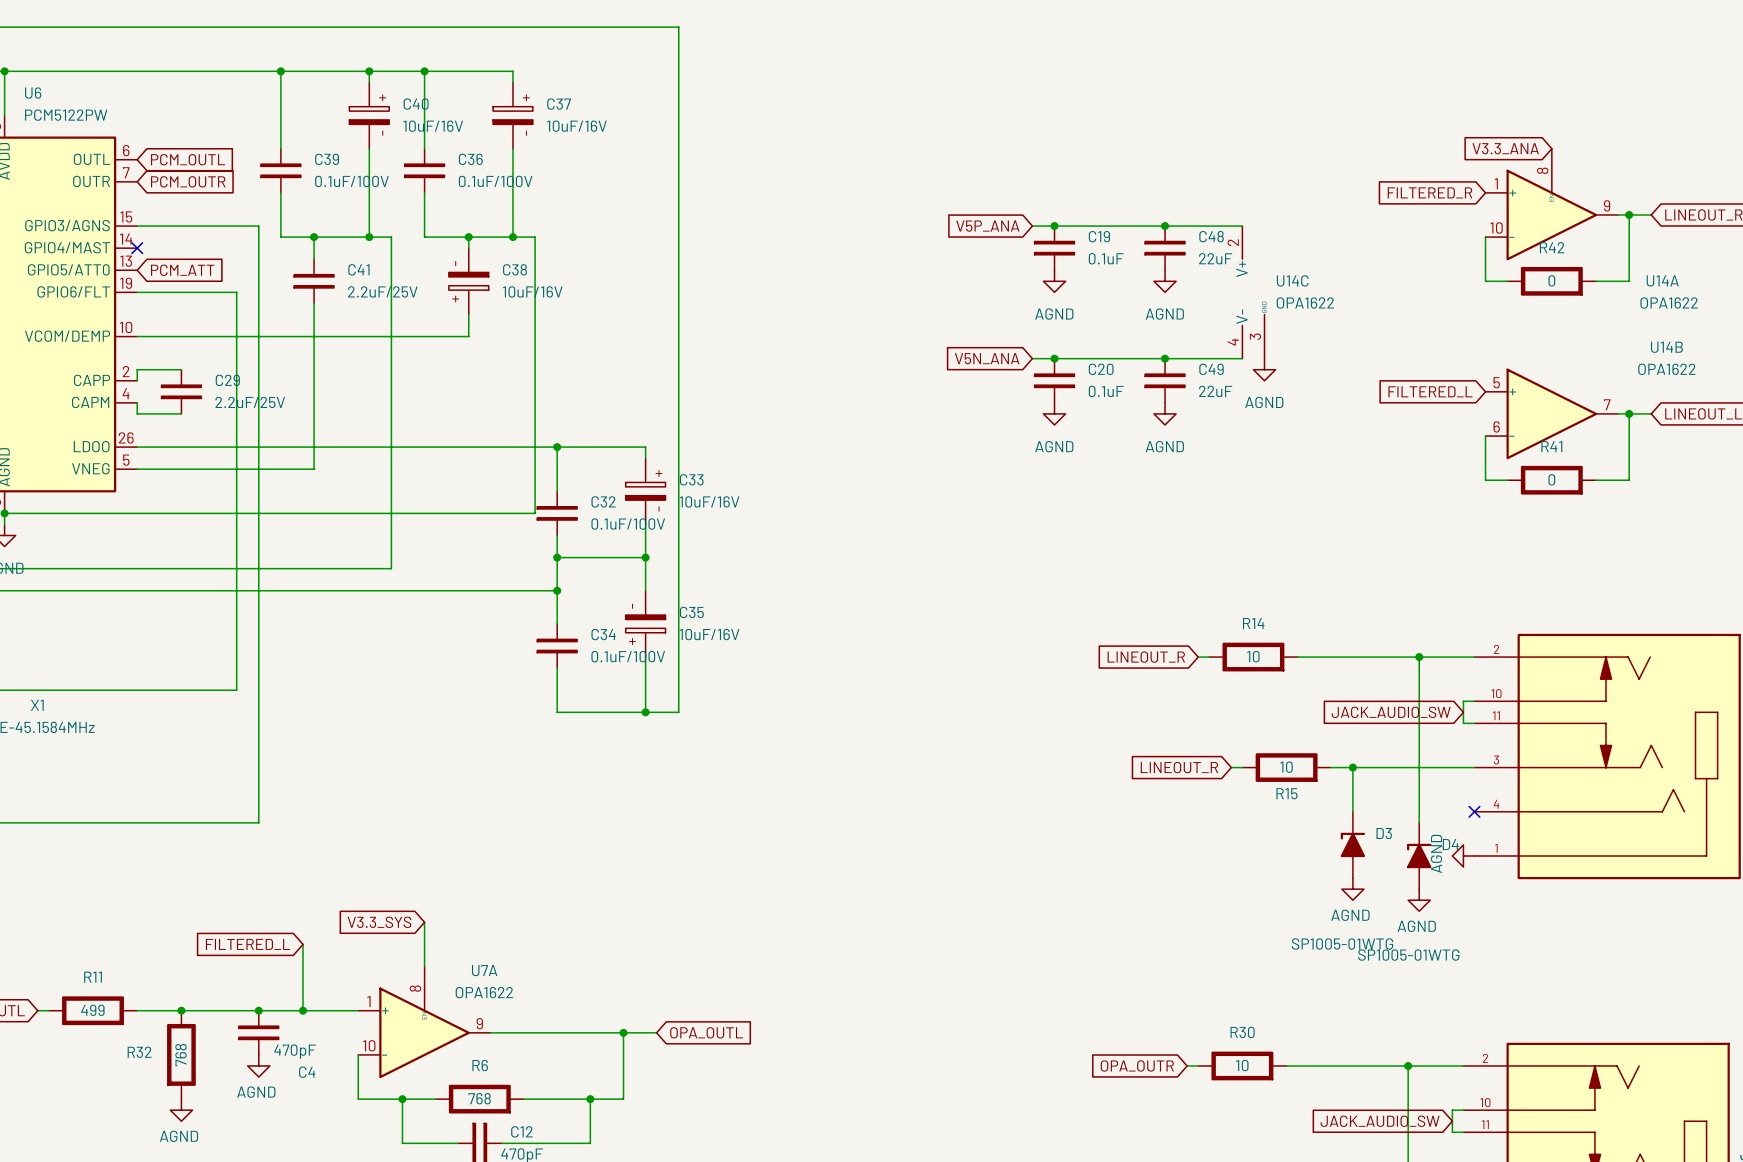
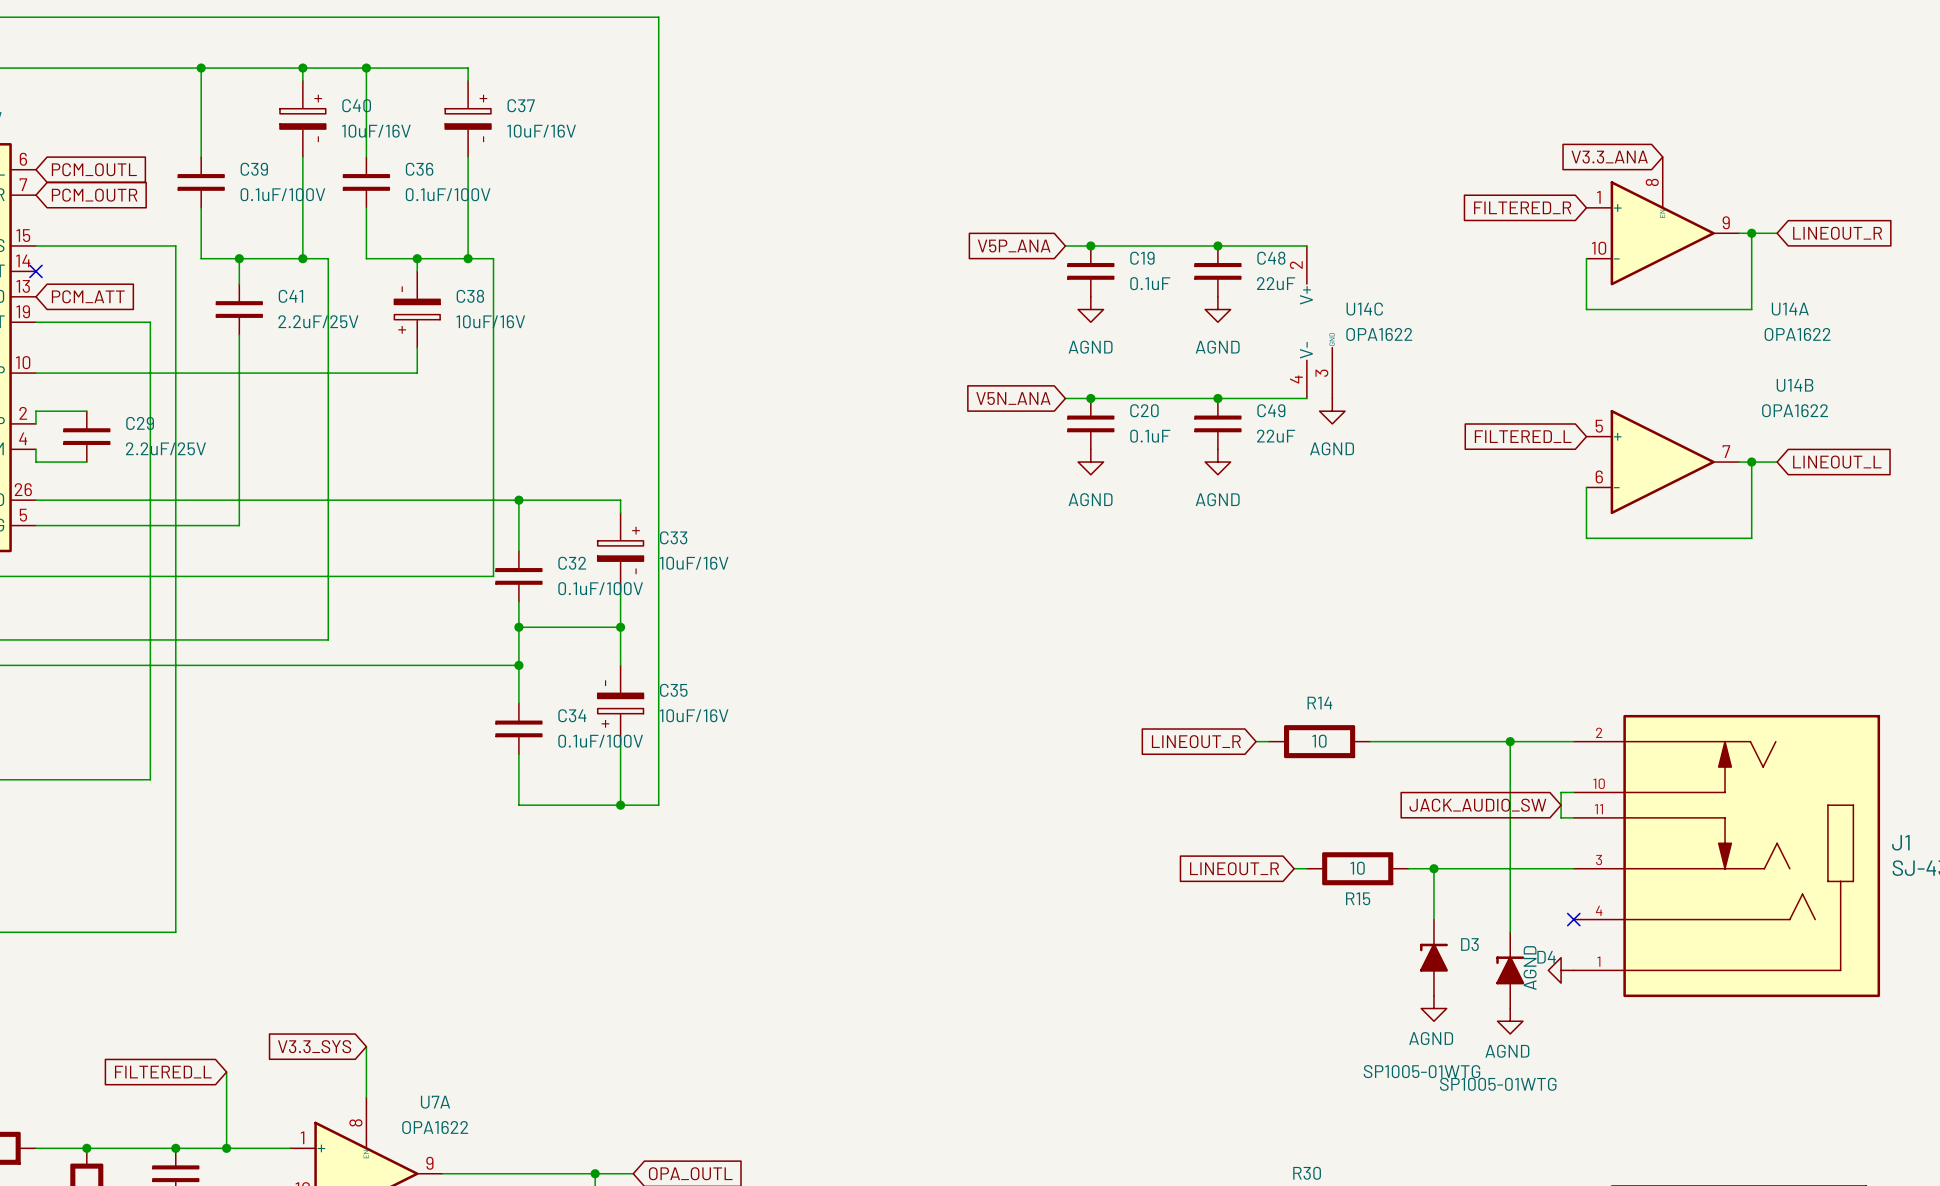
wire: none -> (1611, 309) (1713, 309)
R42: 0 (1551, 281) -> none
wire: none -> (1611, 538) (1713, 538)
R41: 0 (1551, 480) -> none

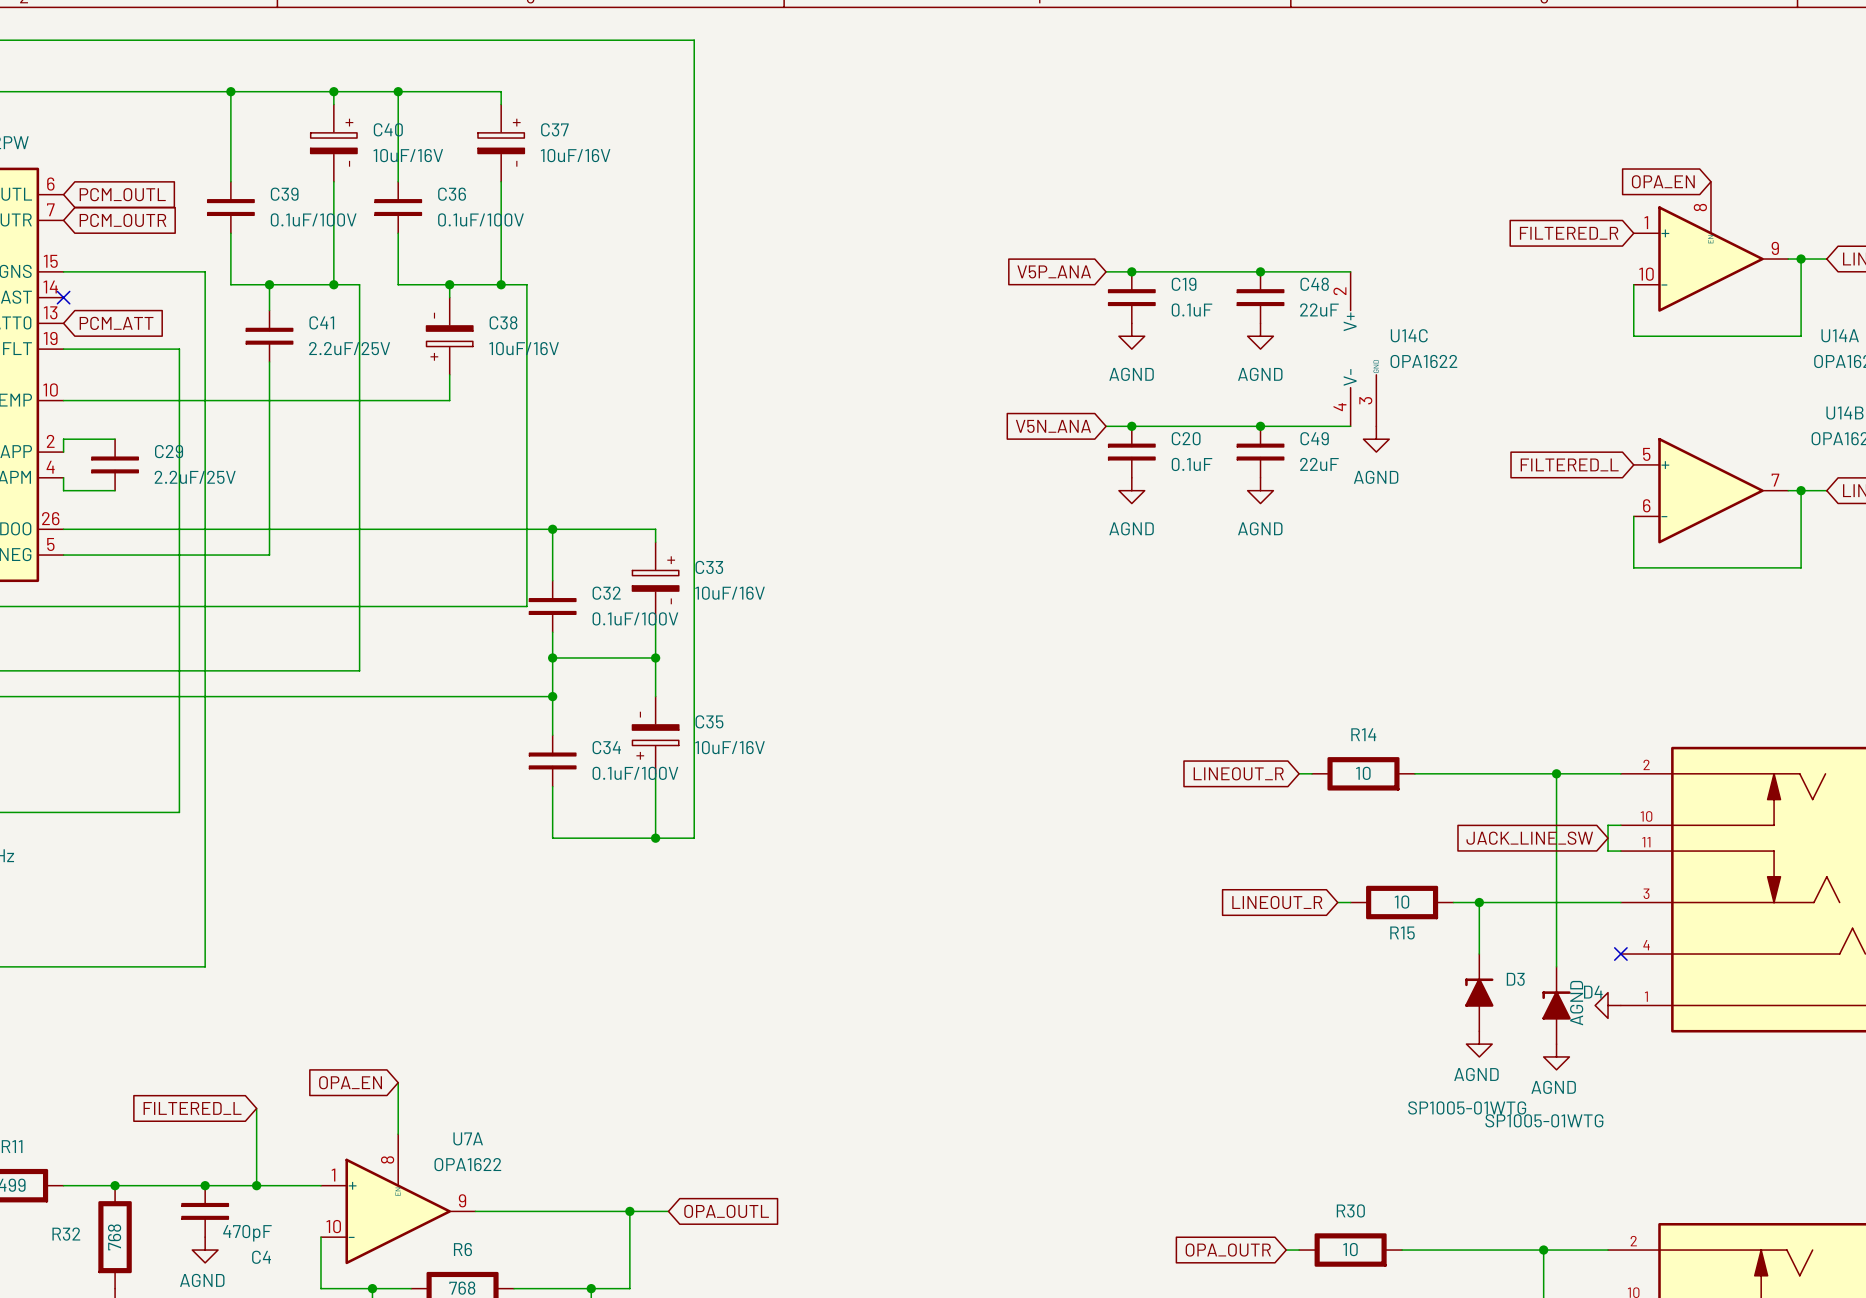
global label: V3.3_ANA (1609, 157) -> OPA_EN (1663, 181)
global label: JACK_AUDIO_SW (1477, 805) -> JACK_LINE_SW (1529, 838)
global label: V3.3_SYS (314, 1046) -> OPA_EN (350, 1082)

